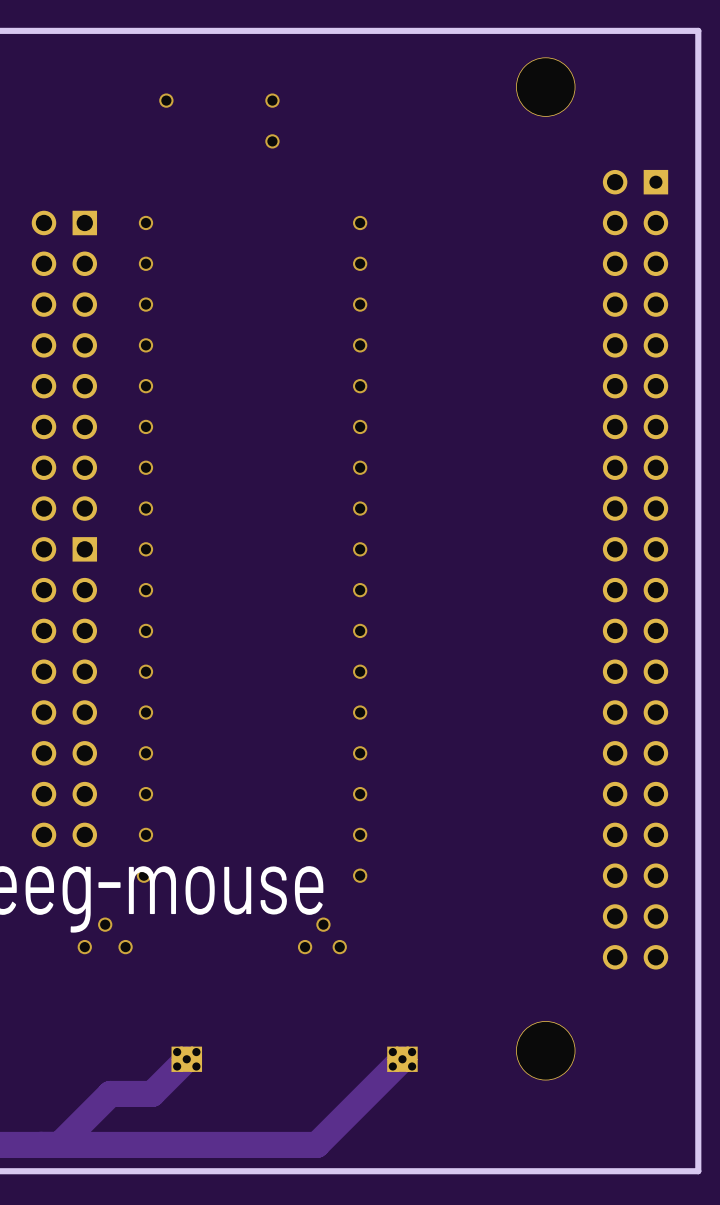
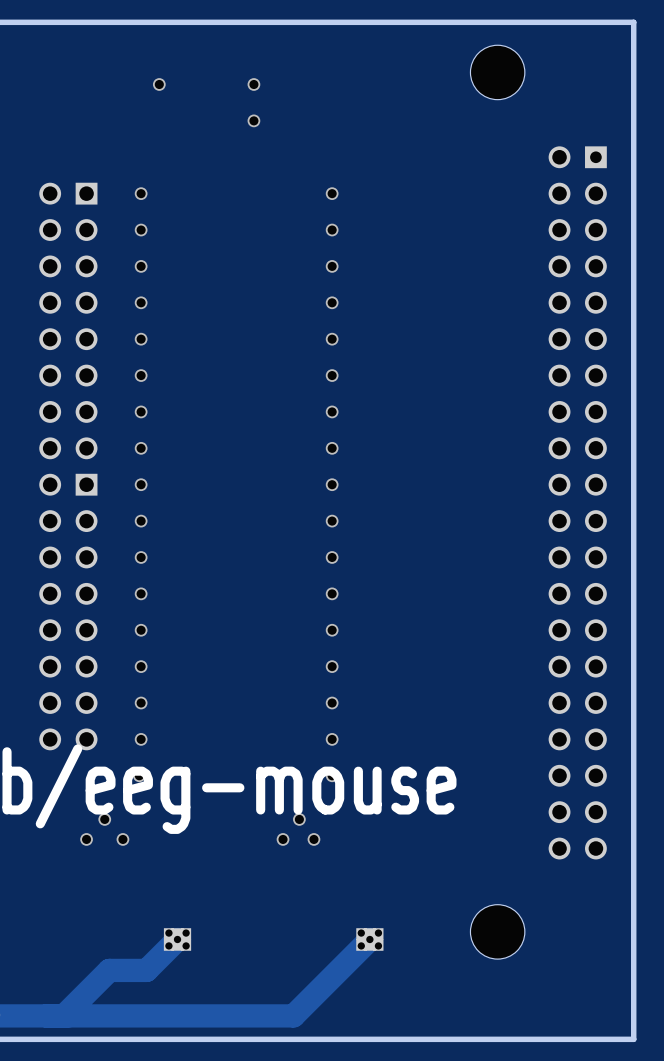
part footprint: [516, 57, 576, 117] -> [470, 45, 525, 100]
part footprint: [516, 1021, 576, 1081] -> [470, 904, 525, 960]

